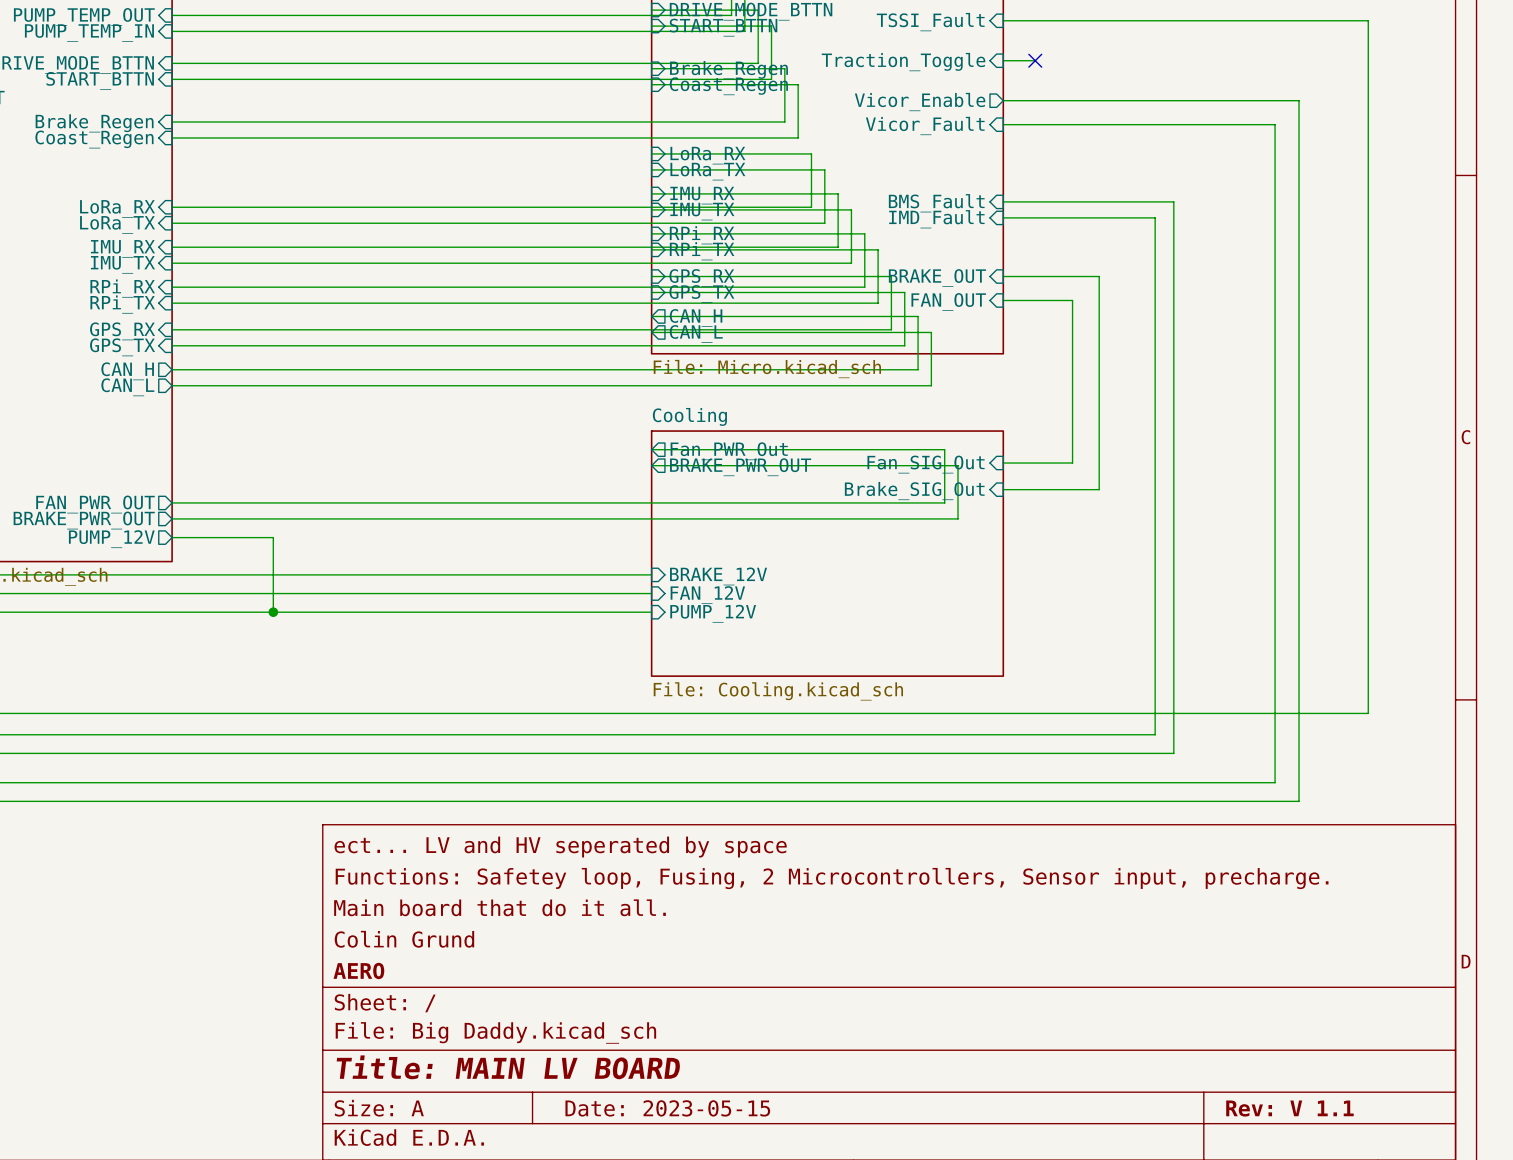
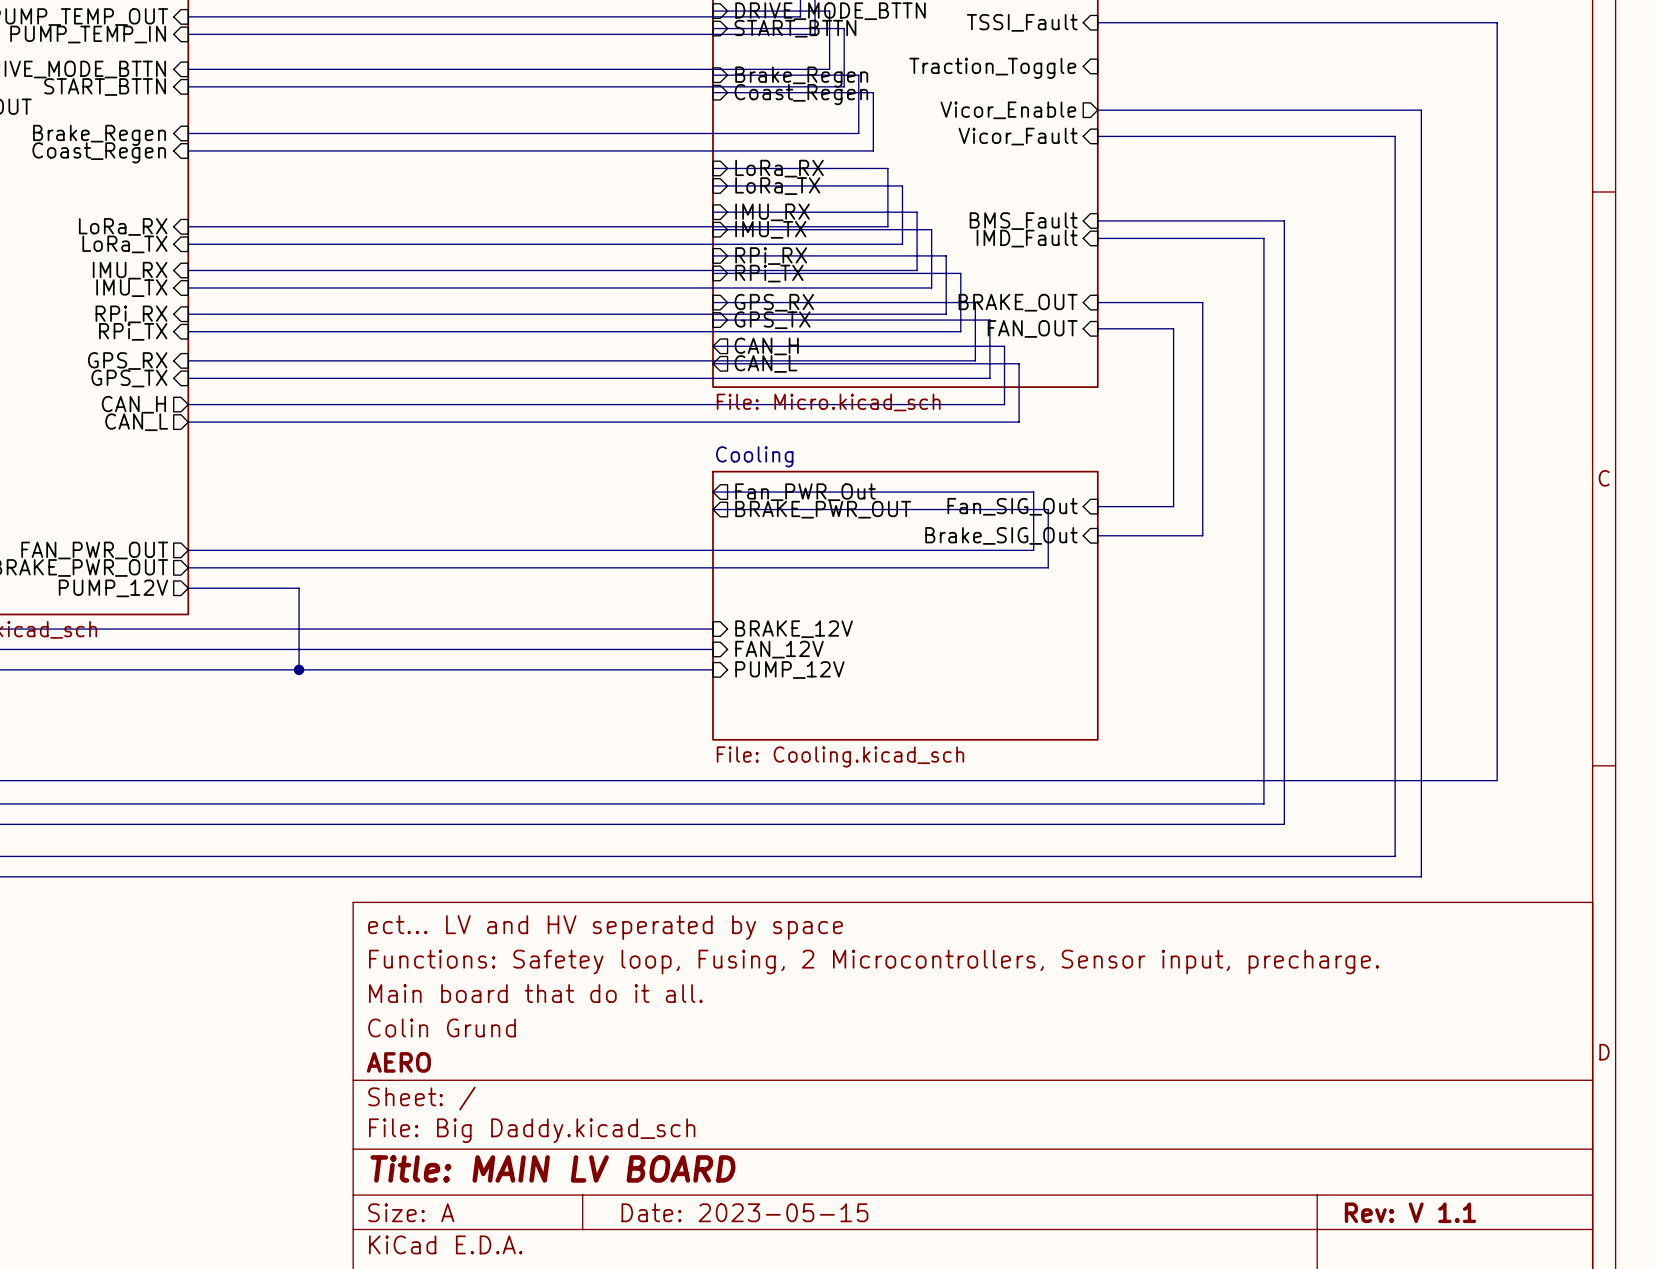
wire: (1003, 60) (1035, 60) -> none
no-connect mark: (1035, 60) -> none

